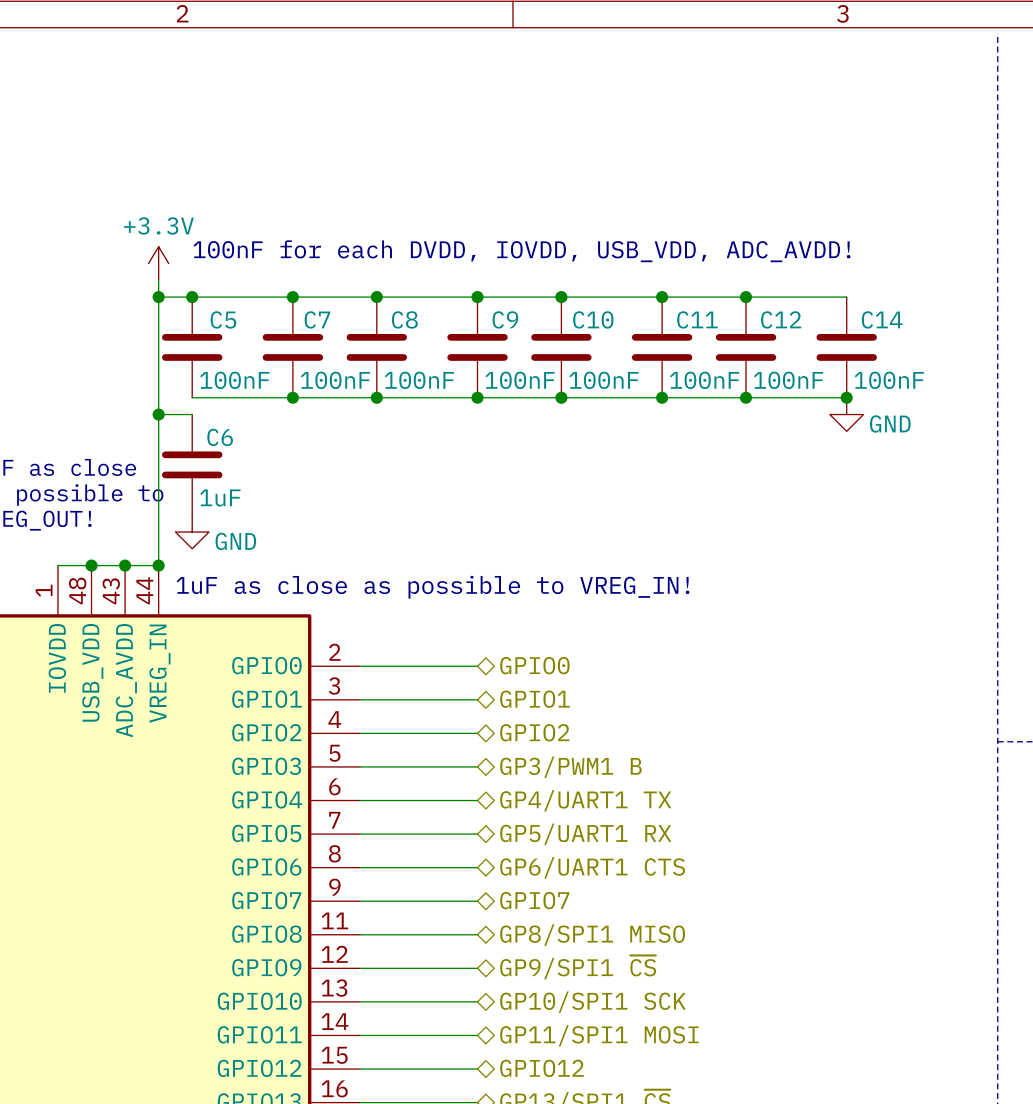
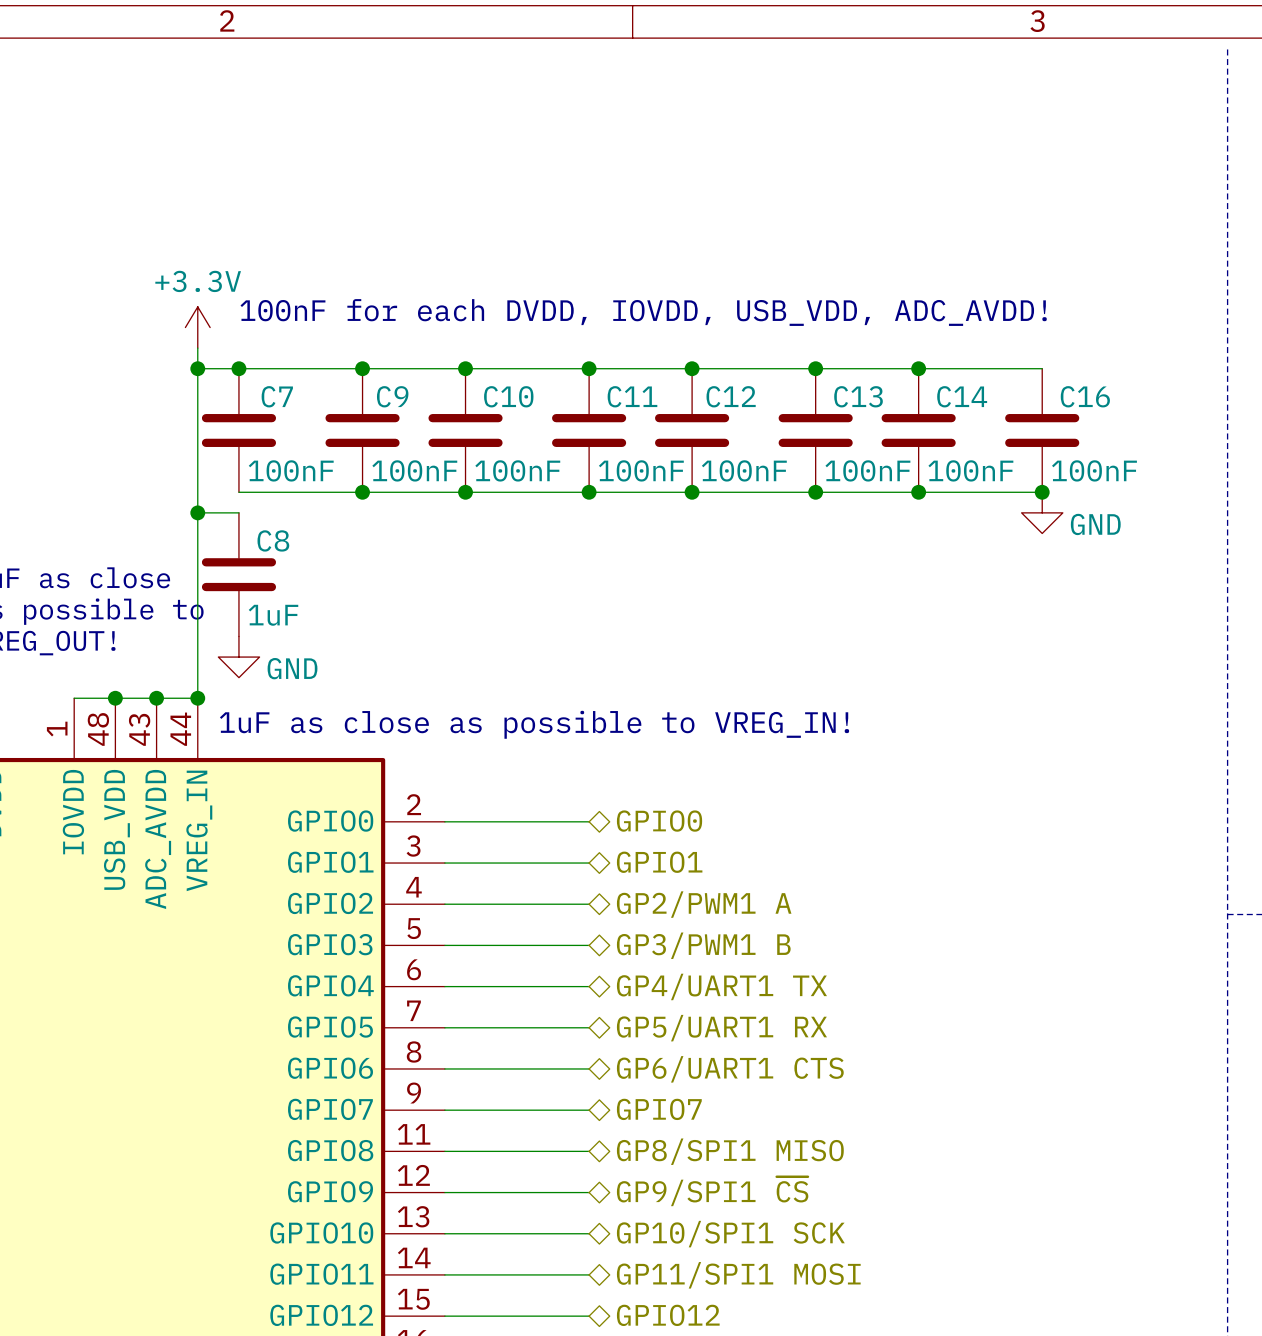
C5 name: C5 (223, 319) -> C7 (277, 396)
C7 name: C7 (317, 319) -> C9 (392, 396)
C8 name: C8 (404, 319) -> C10 (508, 396)
C9 name: C9 (505, 319) -> C11 (632, 396)
C10 name: C10 (593, 319) -> C12 (731, 396)
C11 name: C11 (697, 319) -> C13 (858, 396)
C12 name: C12 (781, 319) -> C14 (962, 396)
C14 name: C14 (882, 319) -> C16 (1085, 396)
C6 name: C6 (220, 437) -> C8 (273, 540)
hierarchical label: GPIO2 (534, 732) -> GP2/PWM1 A (704, 904)

